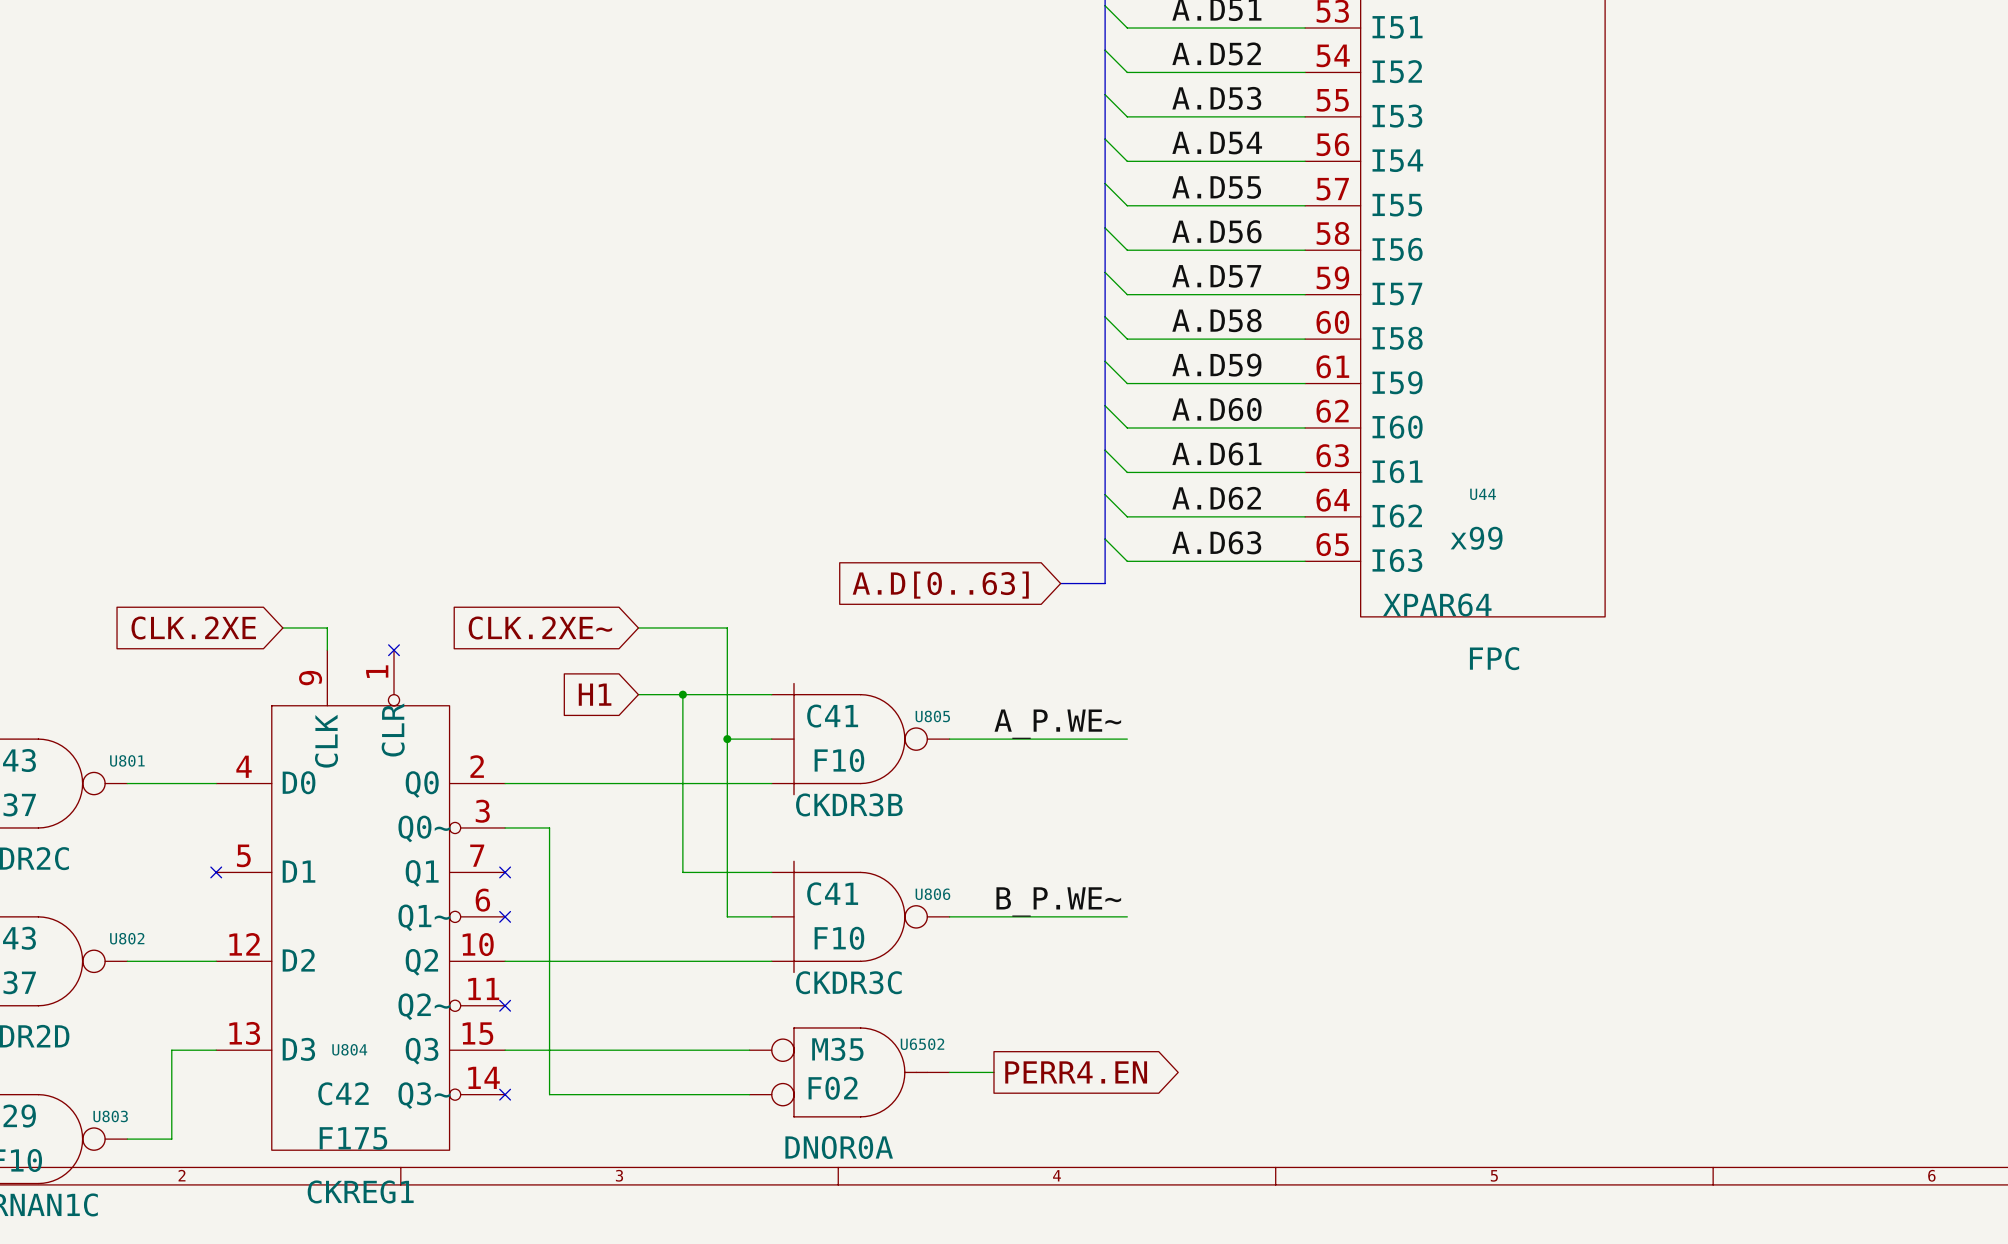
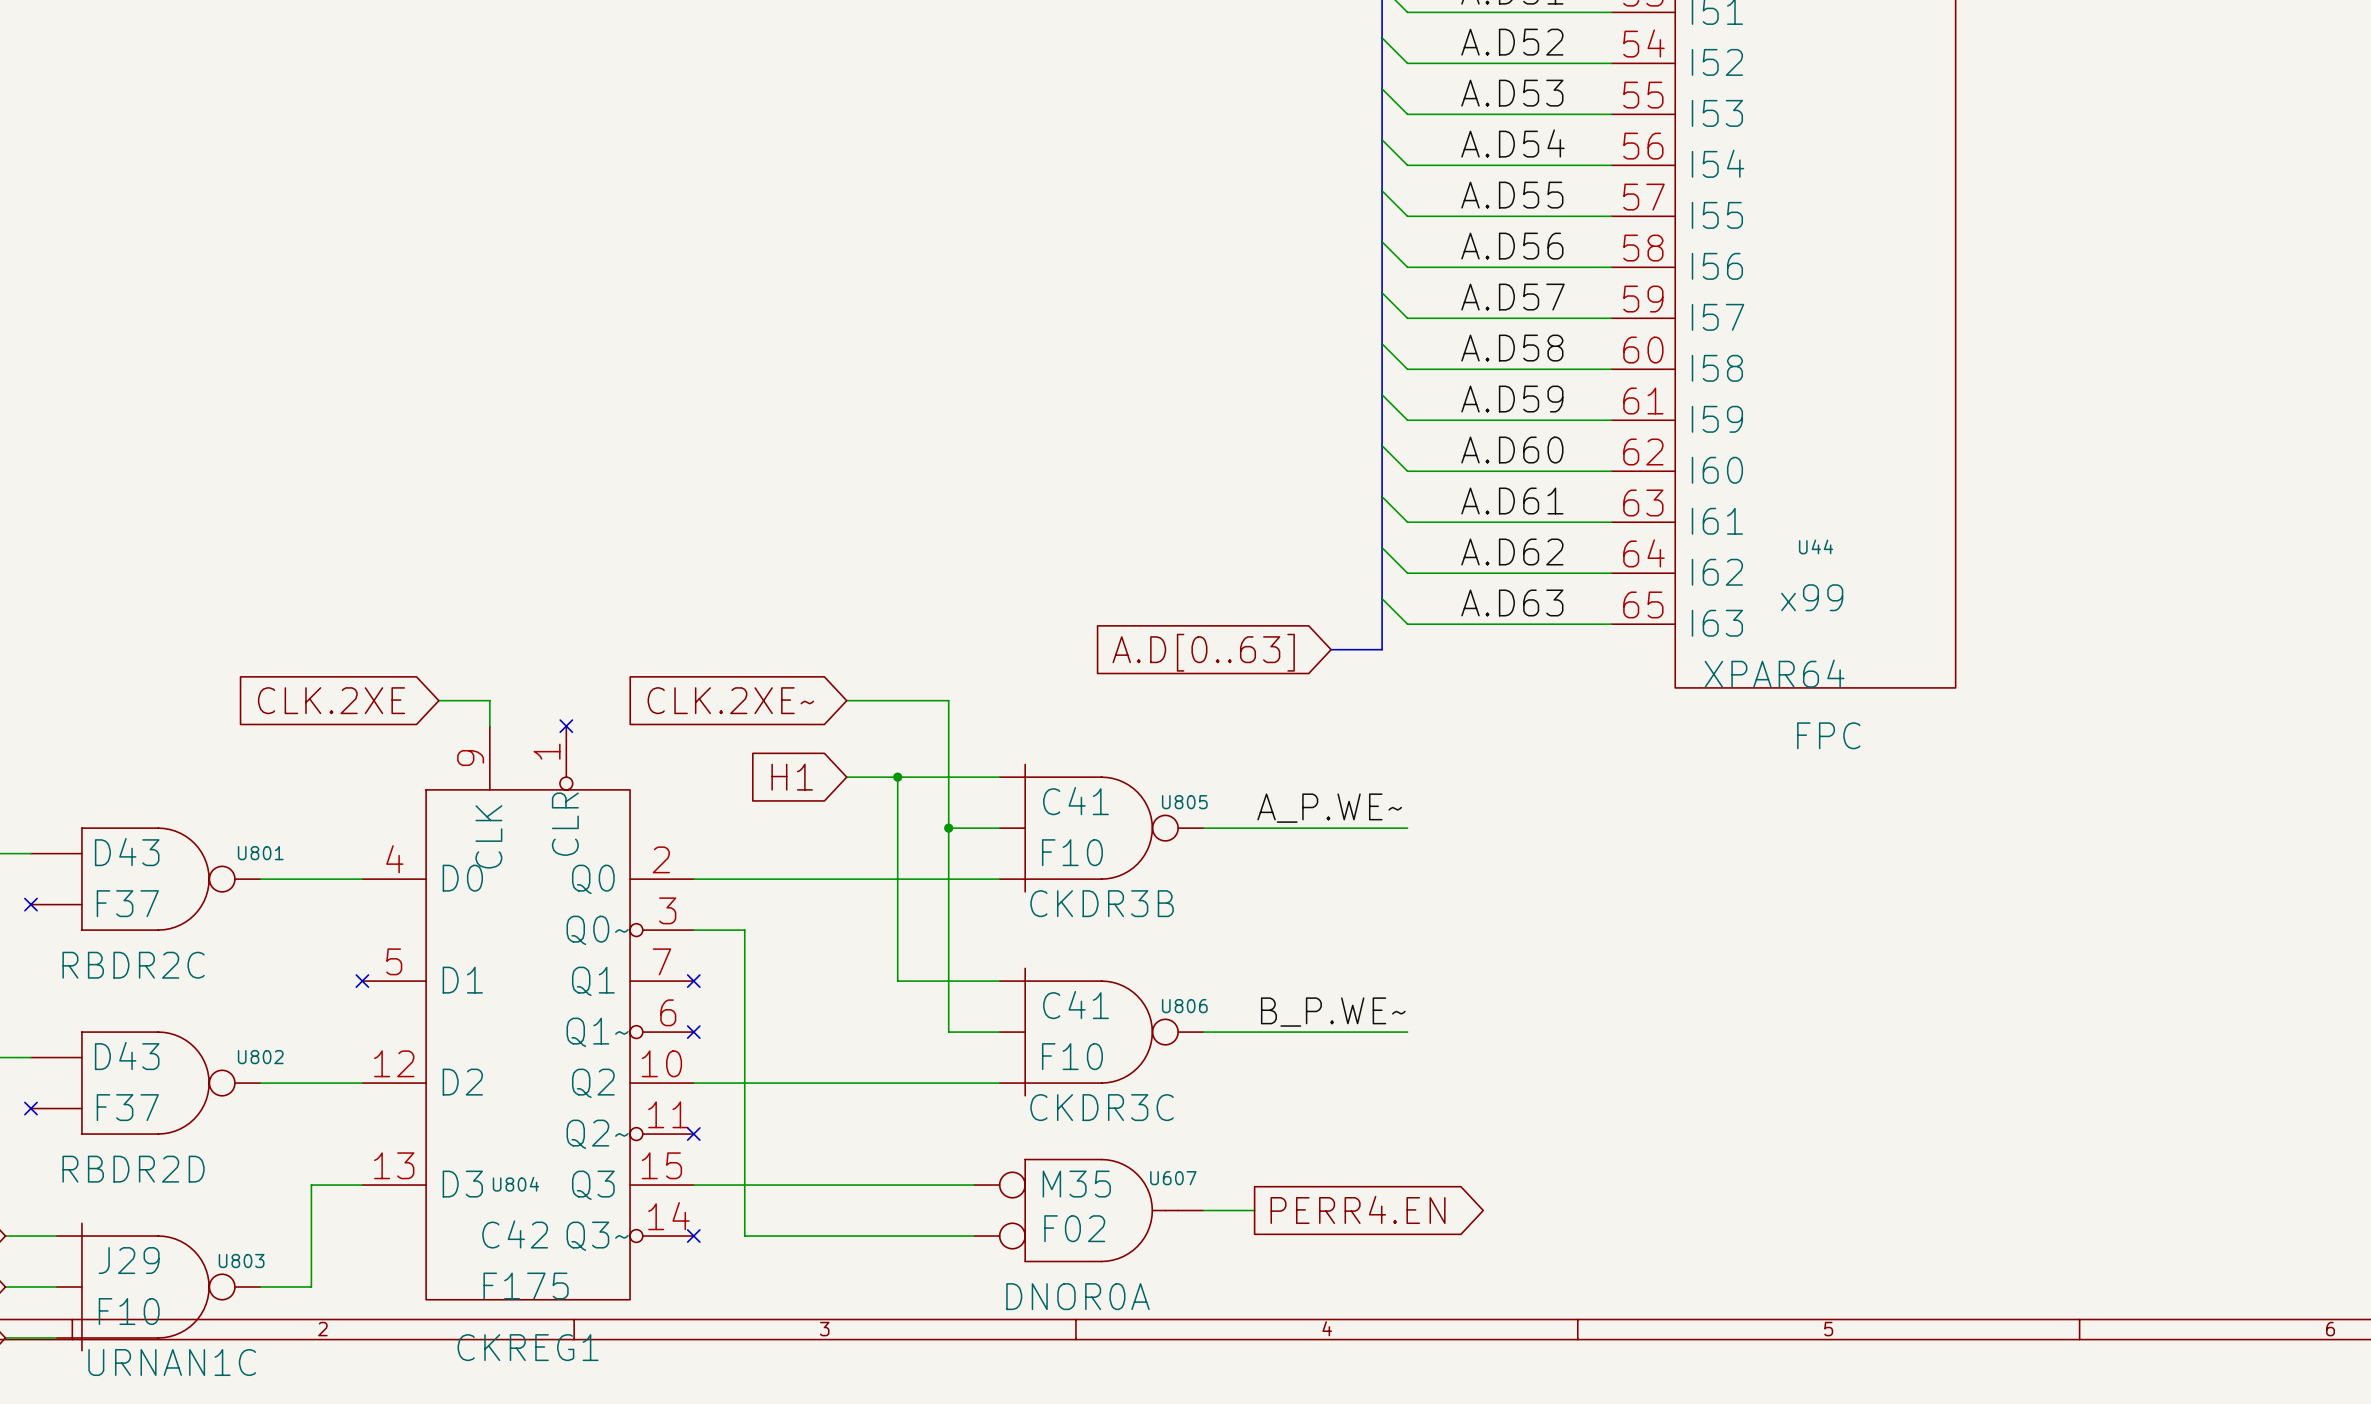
U6502 name: U6502 (922, 1044) -> U607 (1173, 1178)

